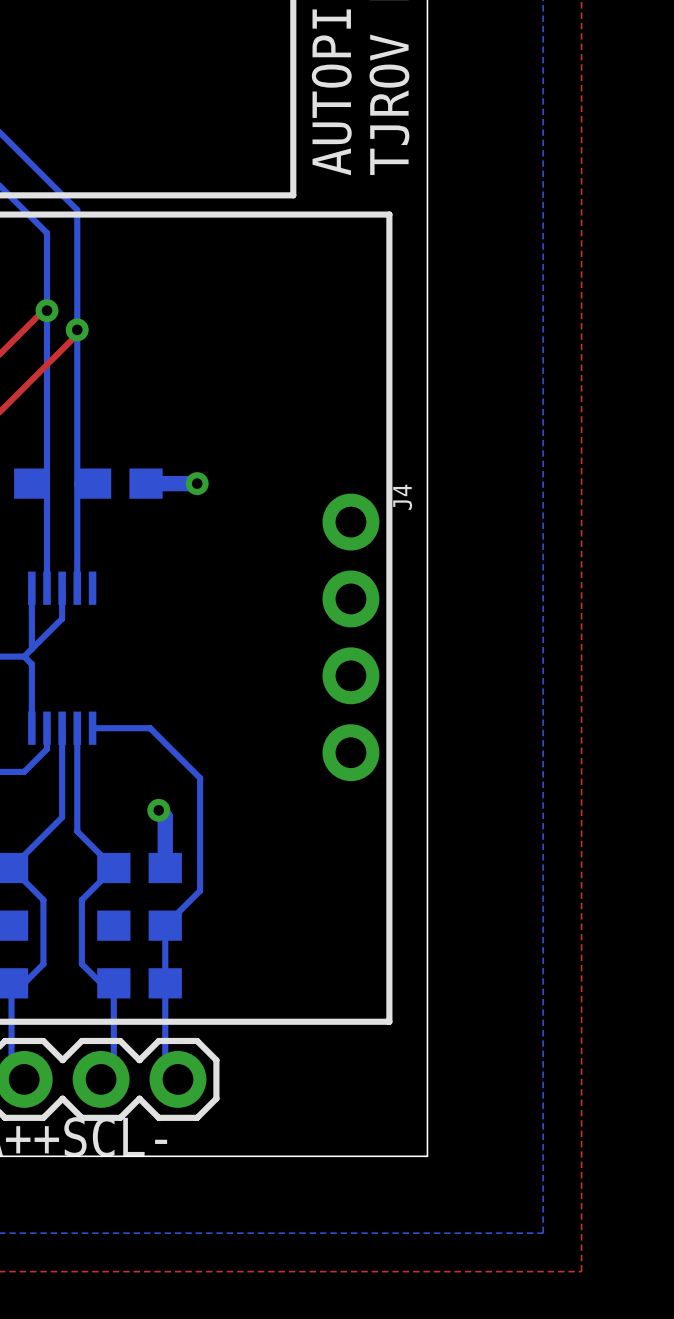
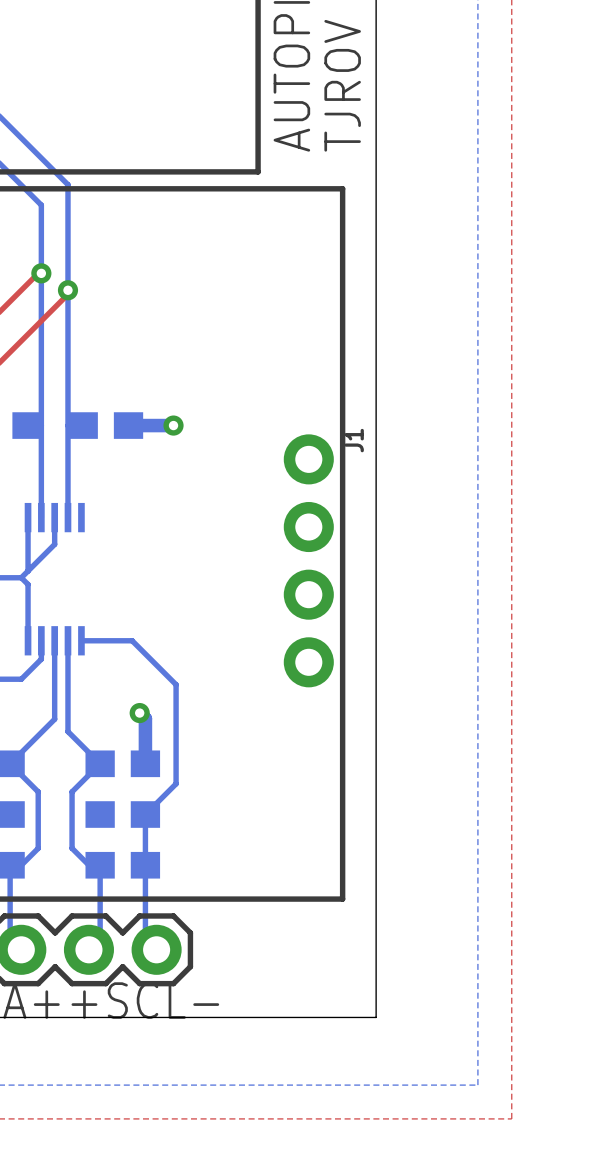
J4 name: J4 (402, 497) -> J1 (354, 440)

